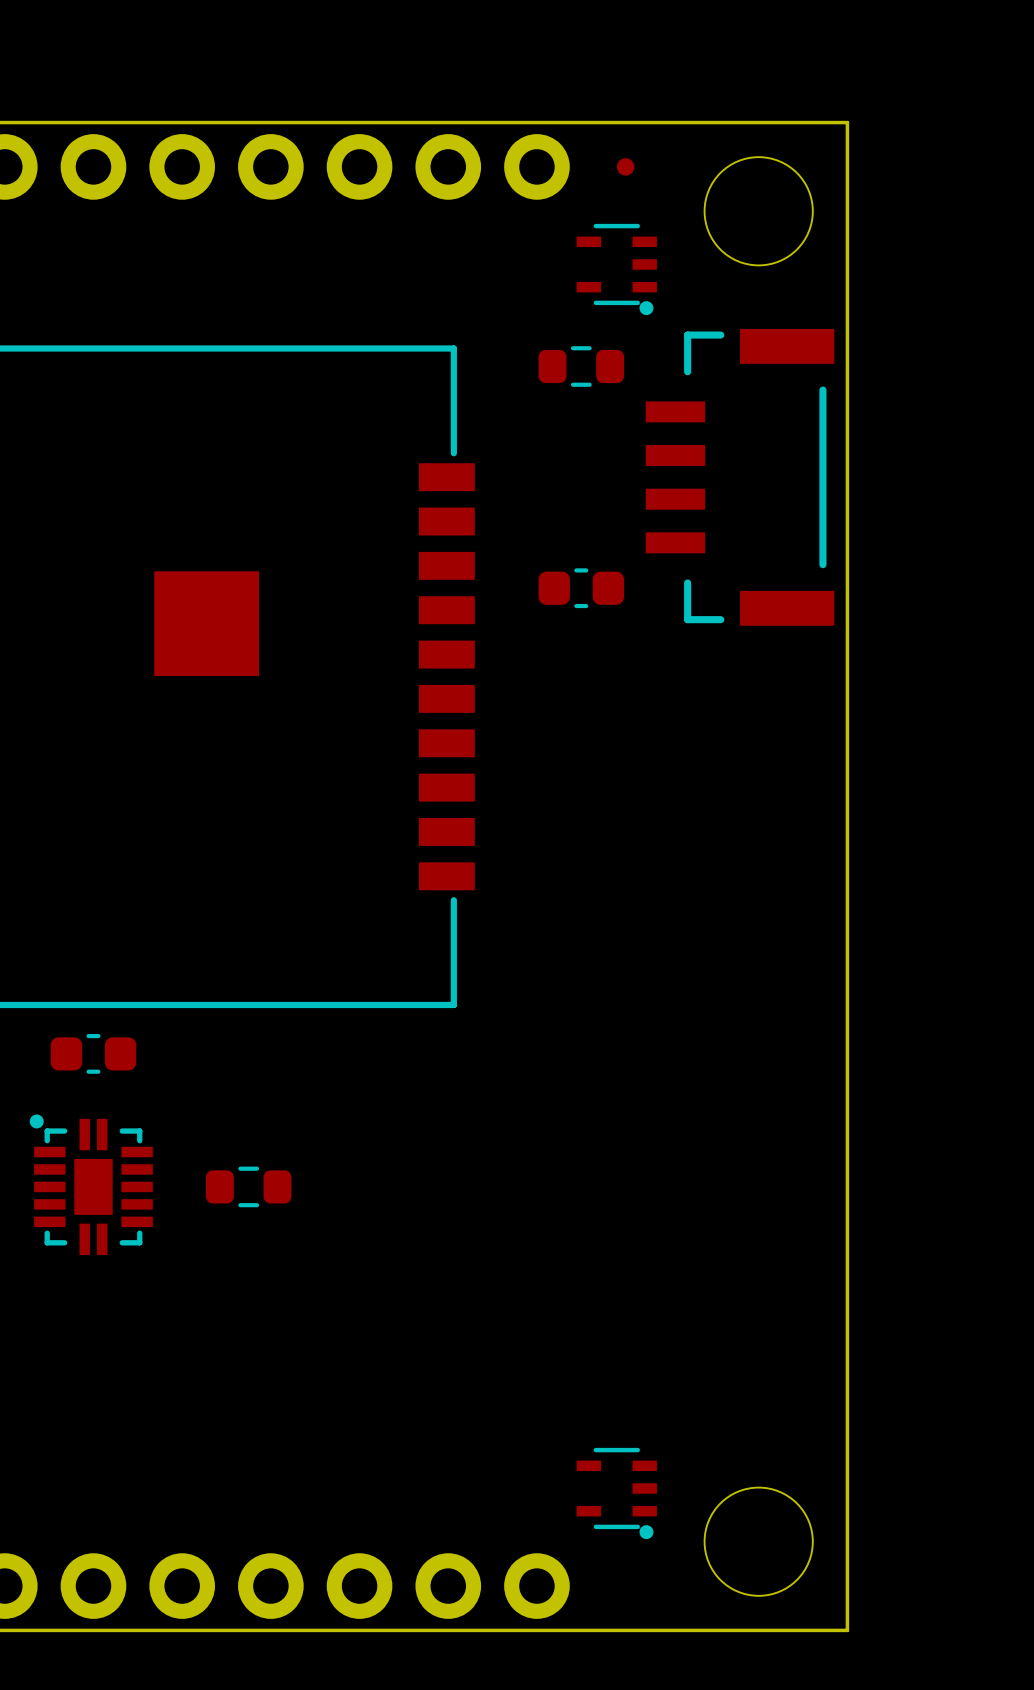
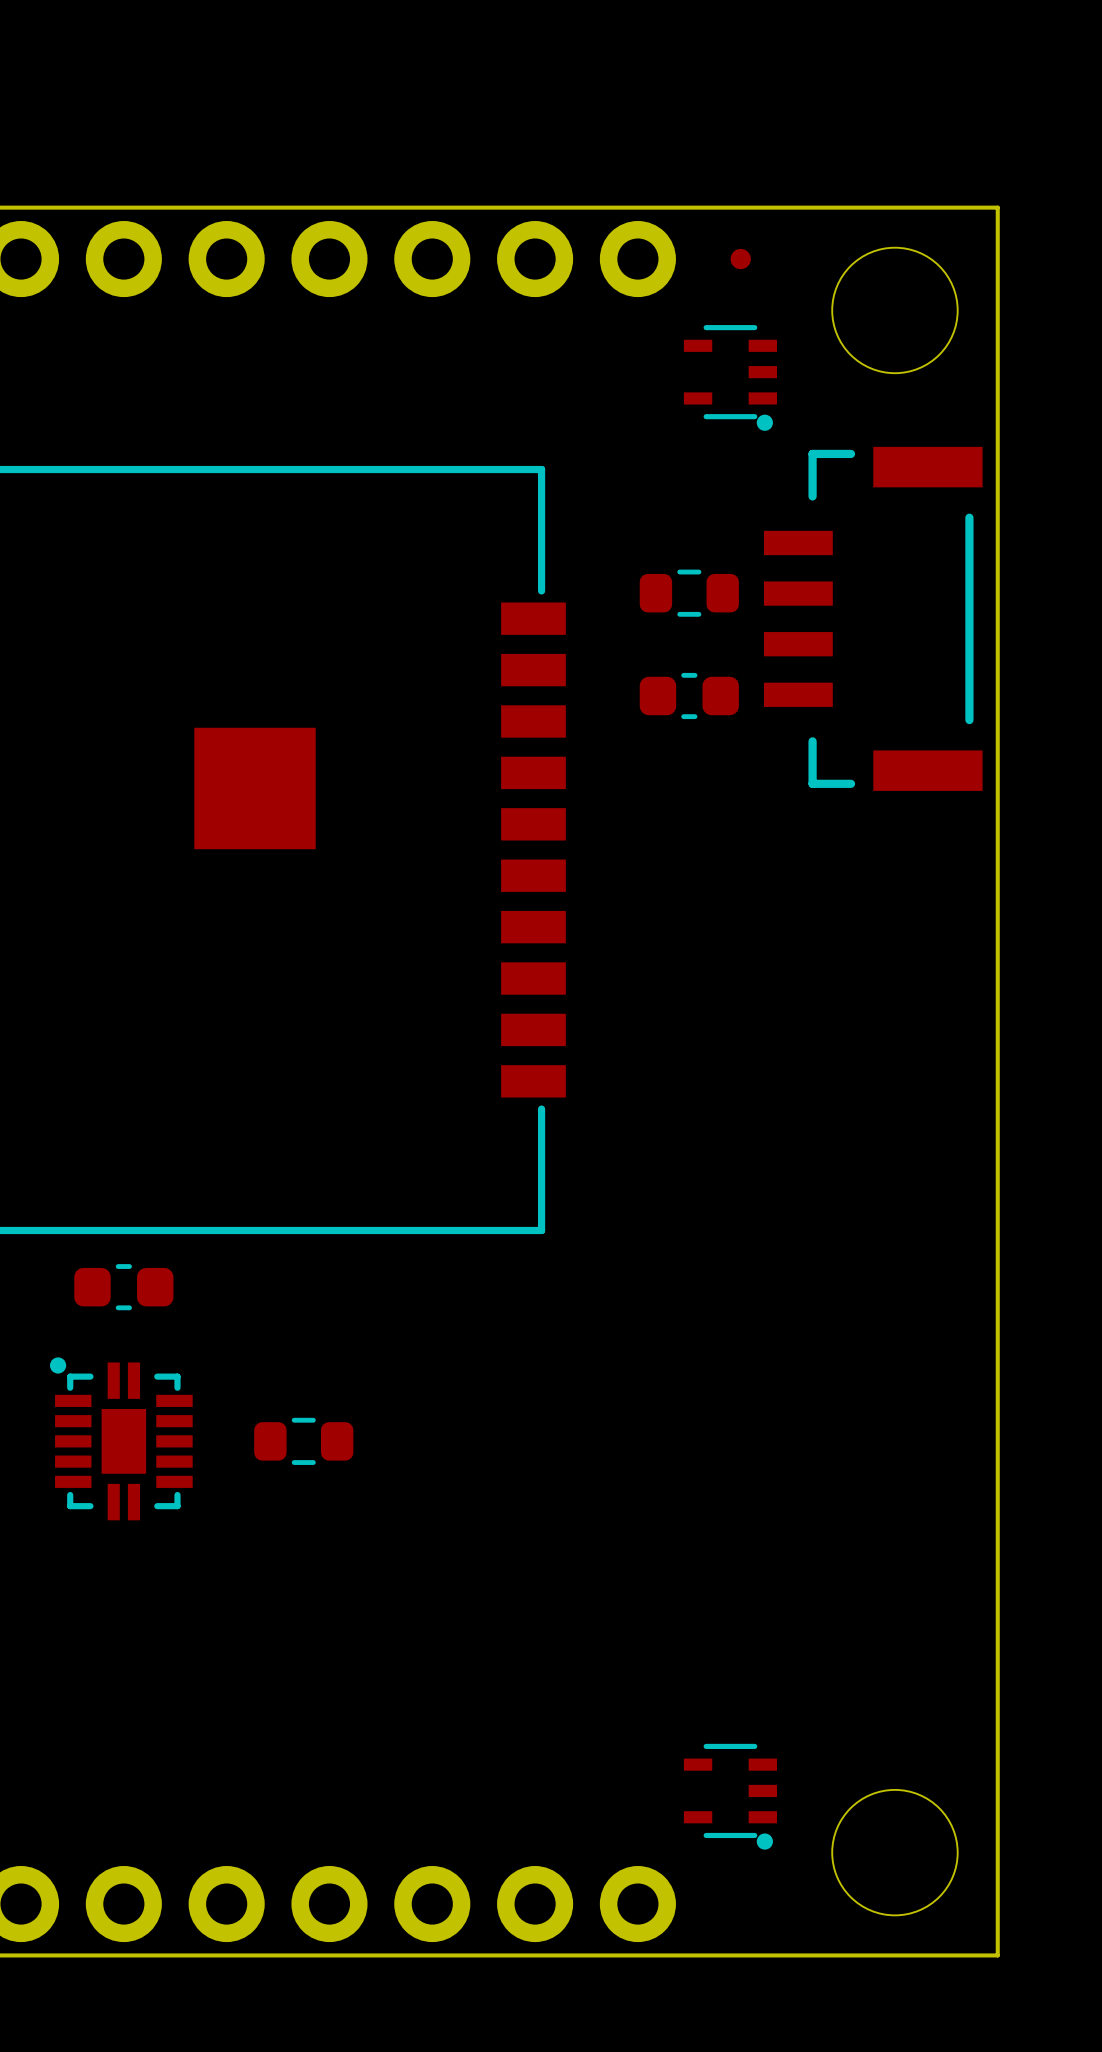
part position: (581, 366) -> (689, 593)
part position: (581, 588) -> (689, 695)

